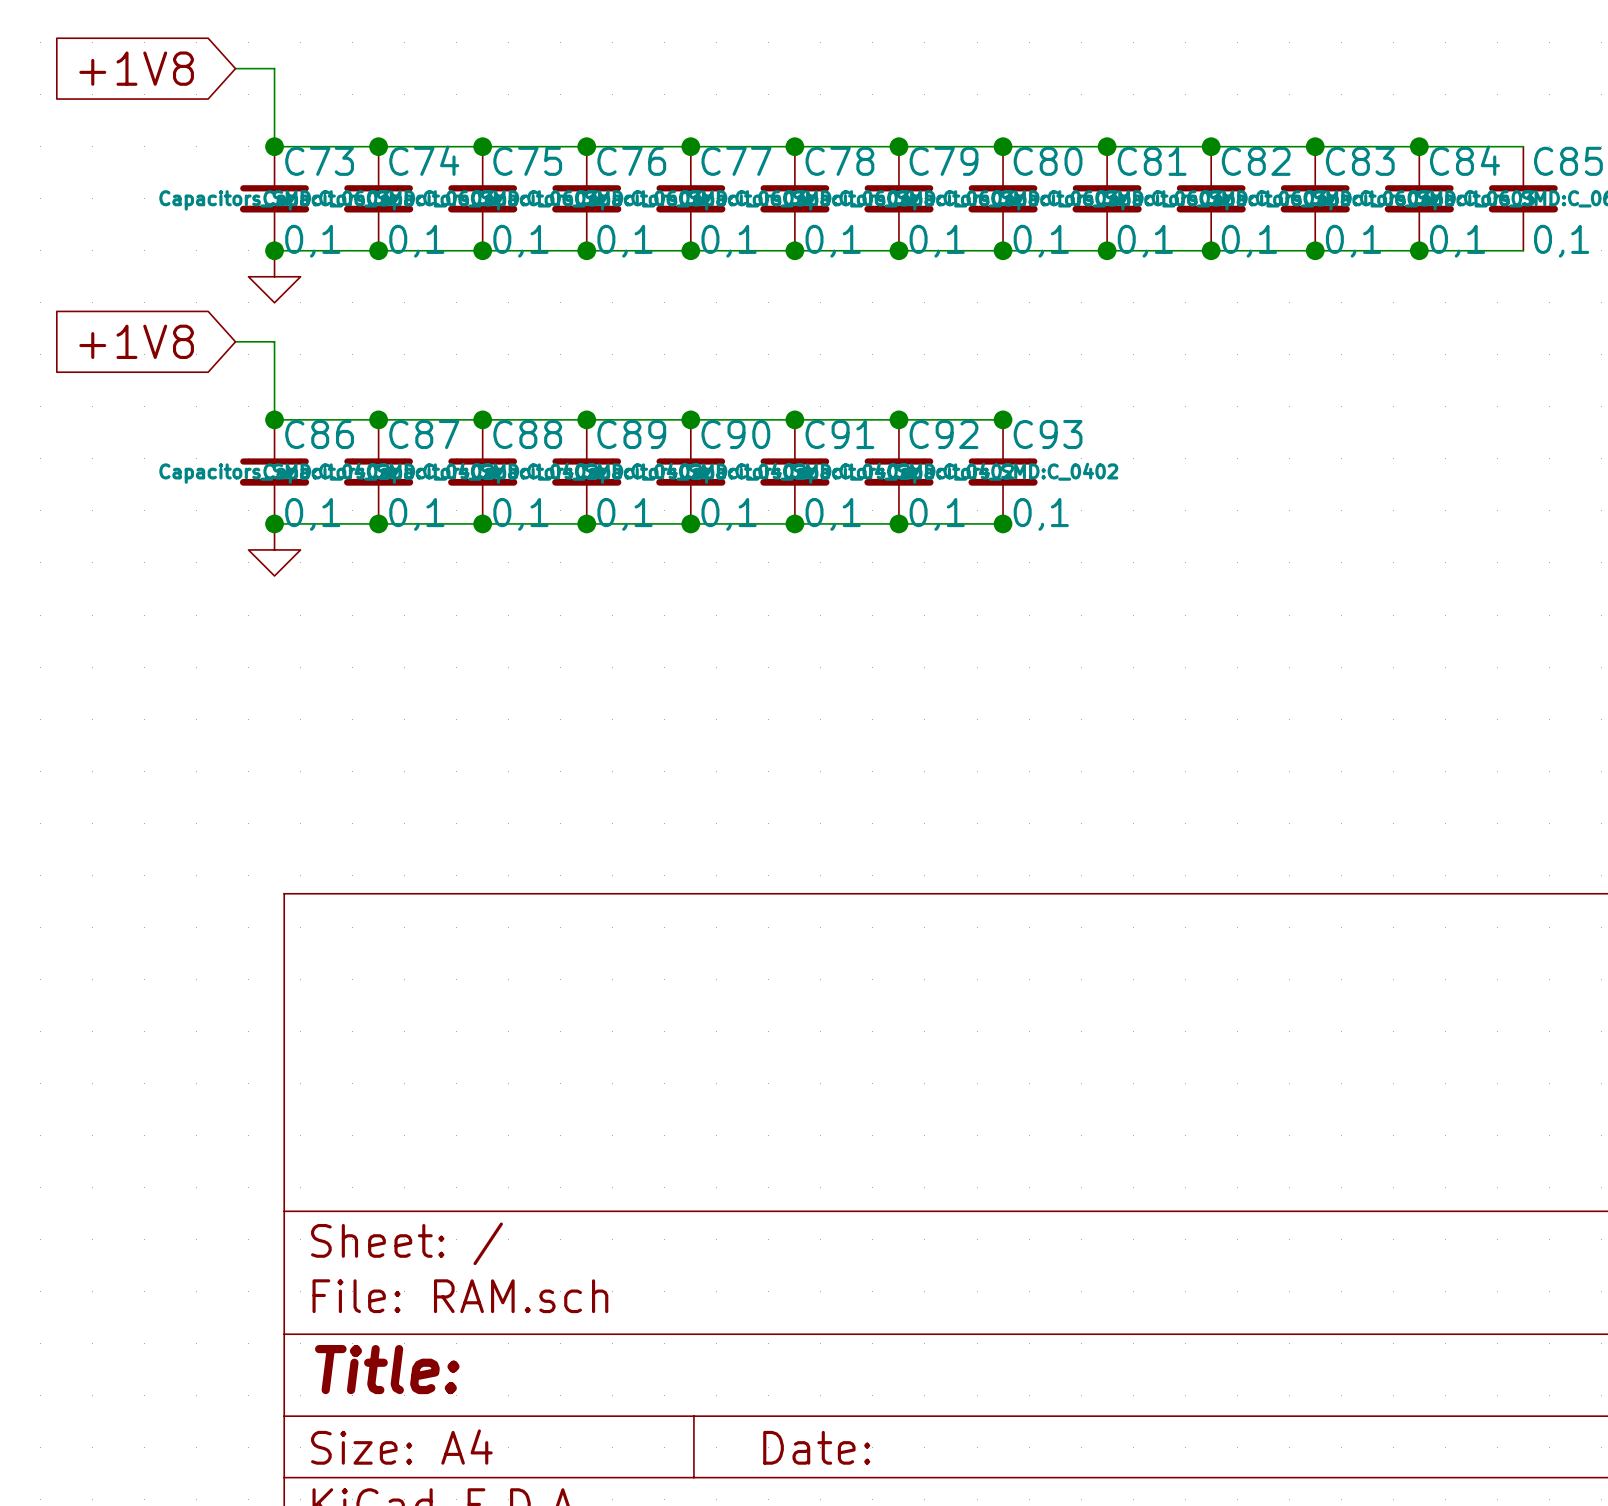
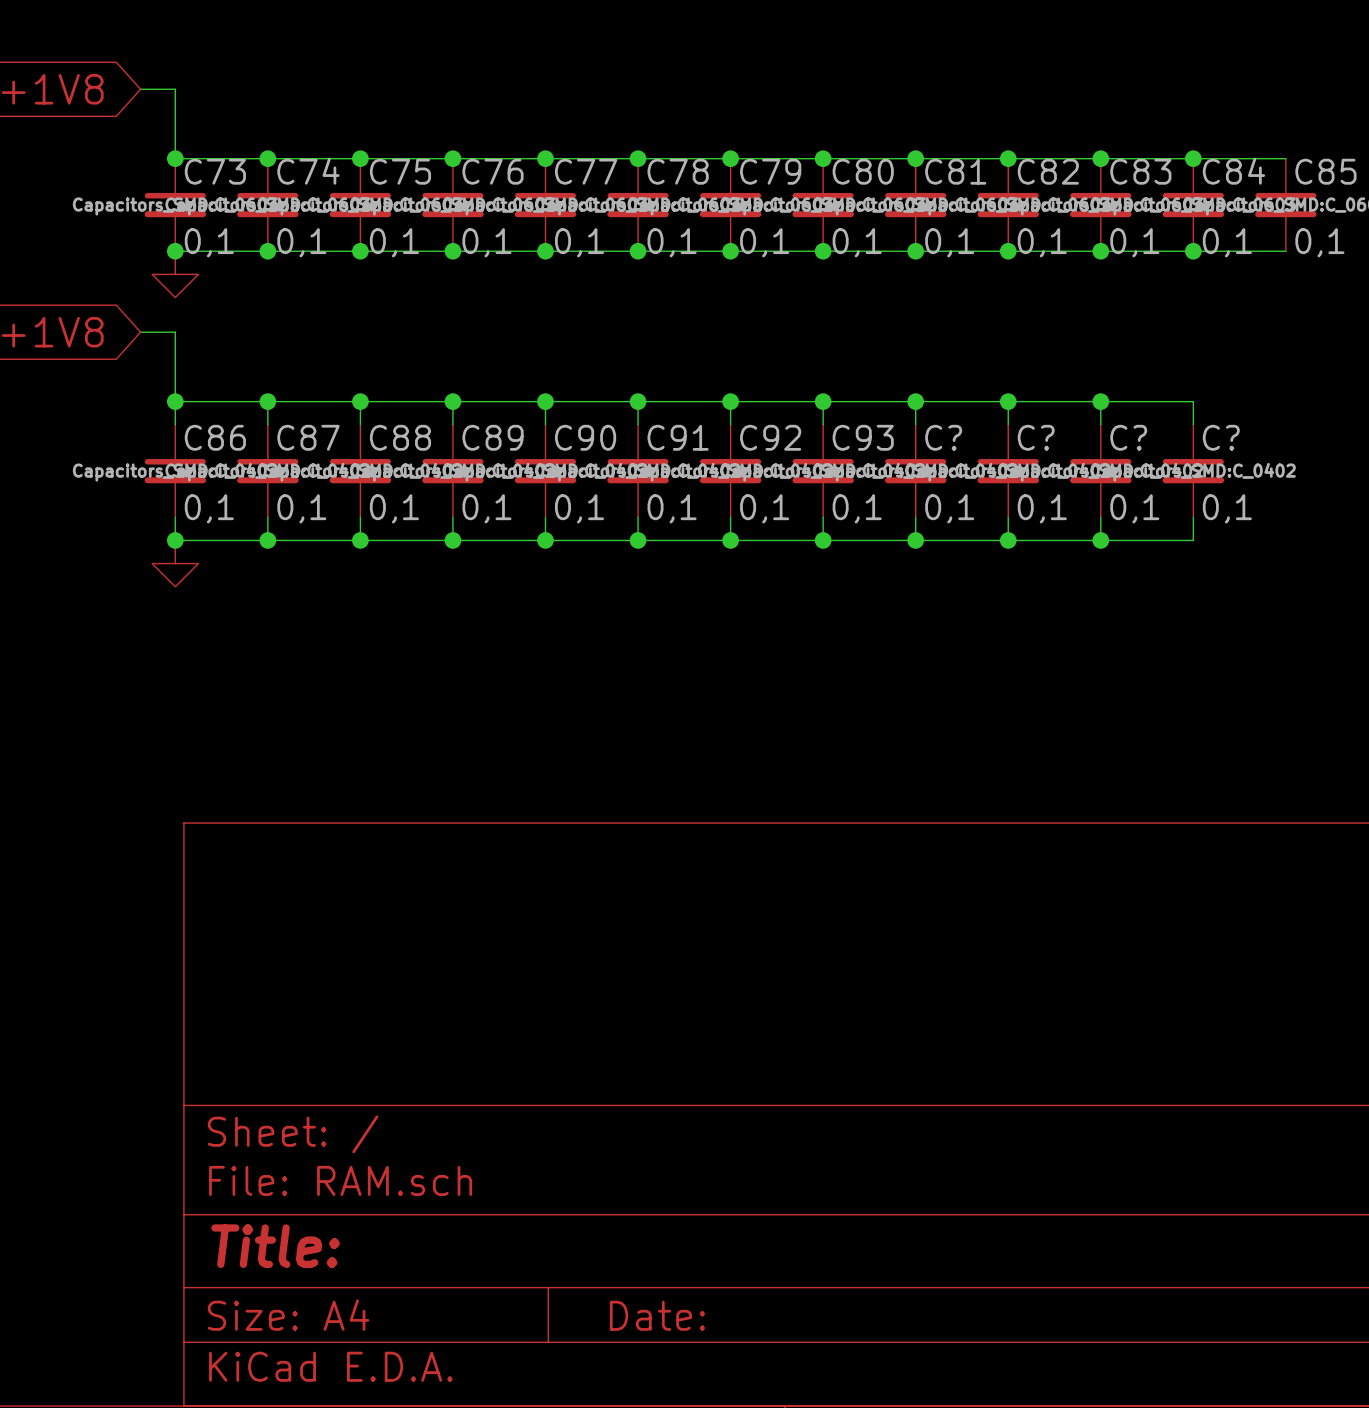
wire: none -> (915, 401) (915, 424)
junction: none -> (915, 401)
wire: none -> (1008, 401) (1008, 424)
junction: none -> (1008, 401)
wire: none -> (1100, 401) (1100, 424)
junction: none -> (1100, 401)
wire: none -> (823, 424) (823, 401) (1193, 401) (1193, 424)
C86 position: (274, 471) -> (175, 471)
C87 position: (378, 471) -> (267, 471)
C88 position: (482, 471) -> (360, 471)
C89 position: (586, 471) -> (452, 471)
C90 position: (690, 471) -> (545, 471)
C91 position: (794, 471) -> (638, 471)
C92 position: (898, 471) -> (730, 471)
C93 position: (1003, 471) -> (823, 471)
C?: none -> 0,1 (915, 471)
C?: none -> 0,1 (1008, 471)
C?: none -> 0,1 (1100, 471)
C?: none -> 0,1 (1193, 471)
wire: (274, 523) (1003, 523) -> none
junction position: (274, 523) -> (175, 540)
junction position: (378, 523) -> (267, 540)
junction position: (482, 523) -> (360, 540)
junction position: (586, 523) -> (452, 540)
junction position: (690, 523) -> (545, 540)
junction position: (794, 523) -> (638, 540)
junction position: (898, 523) -> (730, 540)
junction position: (1003, 523) -> (823, 540)
wire: none -> (175, 517) (175, 540) (1193, 540) (1193, 517)
power symbol position: (274, 549) -> (175, 563)
wire: none -> (267, 517) (267, 540)
wire: none -> (360, 517) (360, 540)
wire: none -> (452, 517) (452, 540)
wire: none -> (545, 517) (545, 540)
wire: none -> (638, 517) (638, 540)
wire: none -> (730, 517) (730, 540)
wire: none -> (823, 517) (823, 540)
wire: none -> (915, 517) (915, 540)
wire: none -> (1008, 517) (1008, 540)
wire: none -> (1100, 517) (1100, 540)
junction: none -> (915, 540)
junction: none -> (1008, 540)
junction: none -> (1100, 540)

